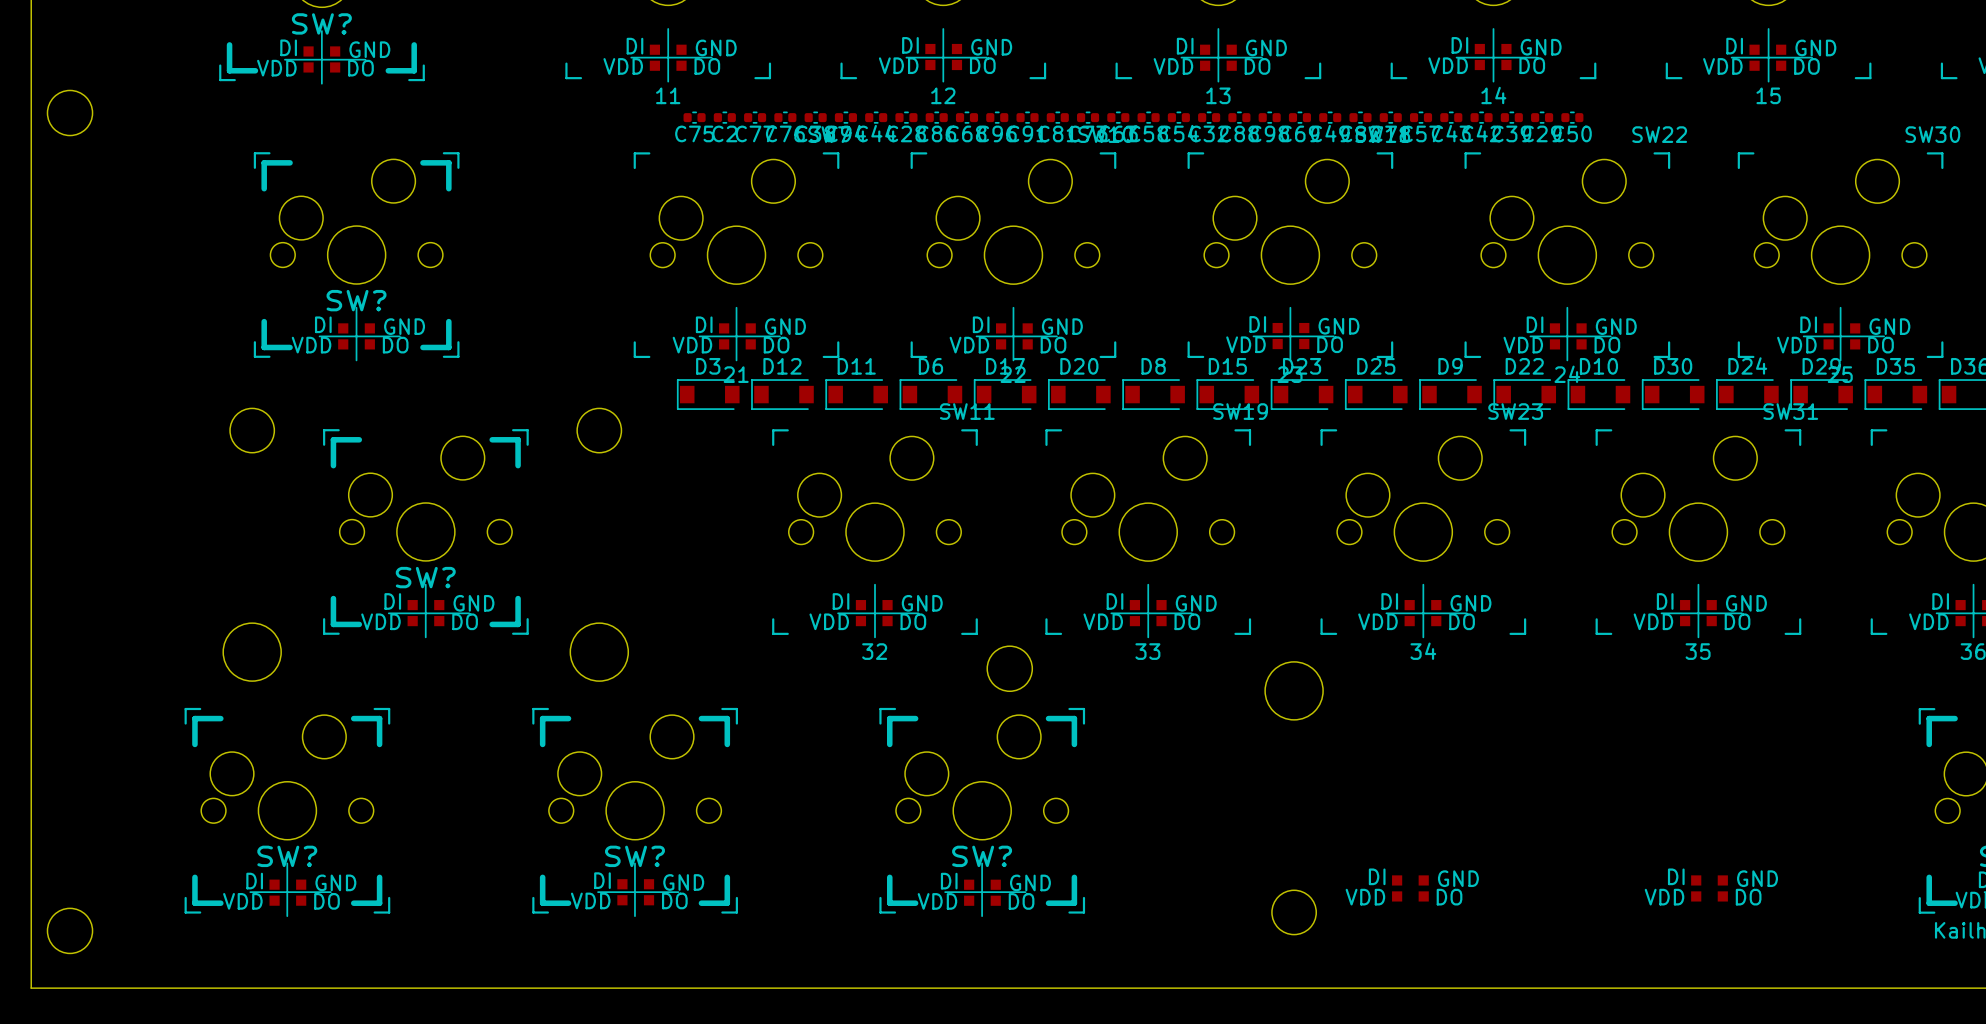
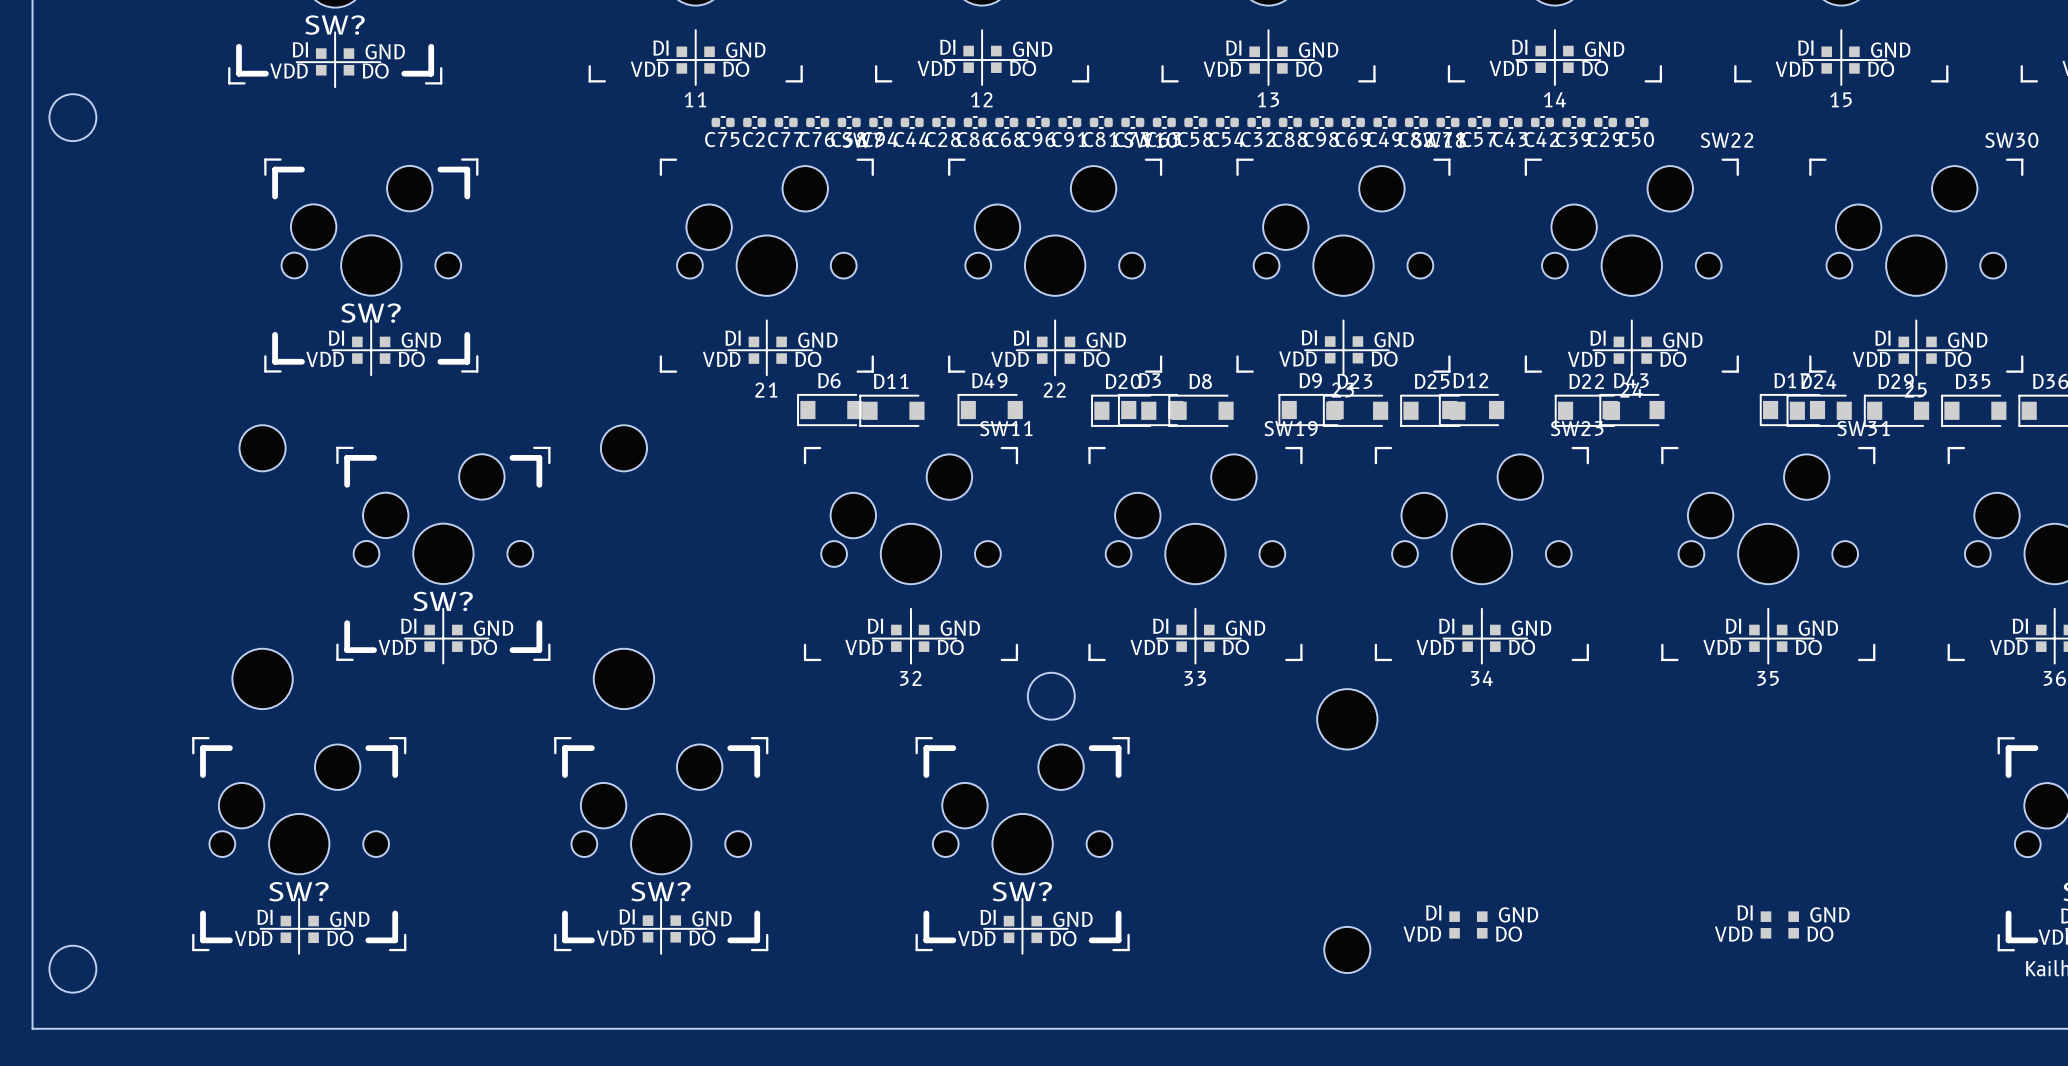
D49: none -> (990, 410)
D43: none -> (1632, 410)
D3 position: (708, 394) -> (1150, 410)
D12 position: (782, 394) -> (1471, 410)
D6 position: (930, 394) -> (829, 410)
D17 position: (1005, 394) -> (1792, 410)
D15: (1227, 394) -> none
D9 position: (1450, 394) -> (1311, 410)
D10: (1598, 394) -> none
D30: (1673, 394) -> none

